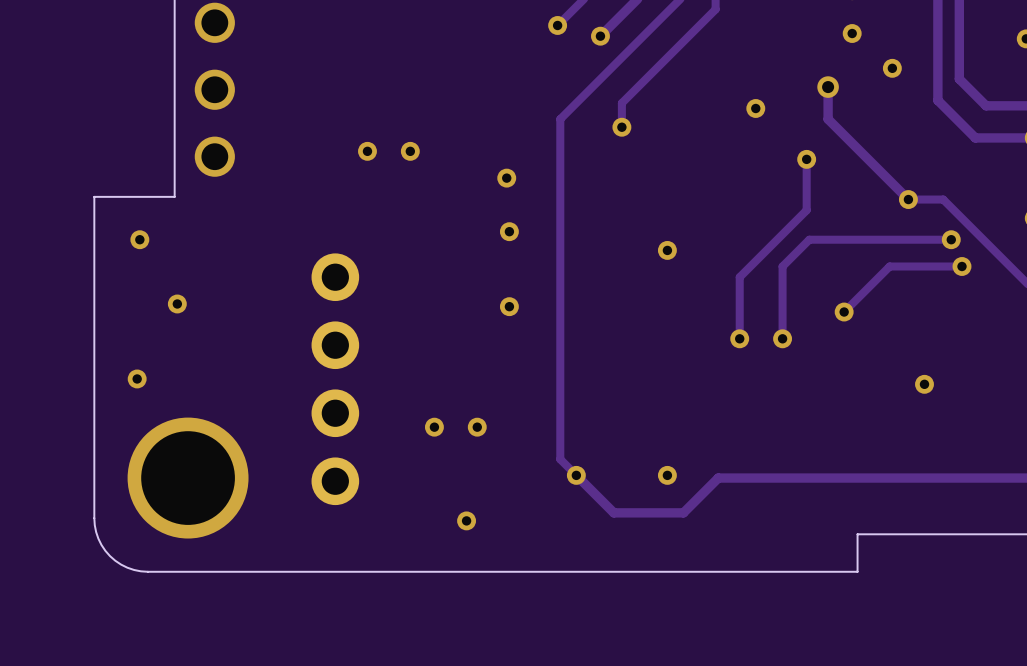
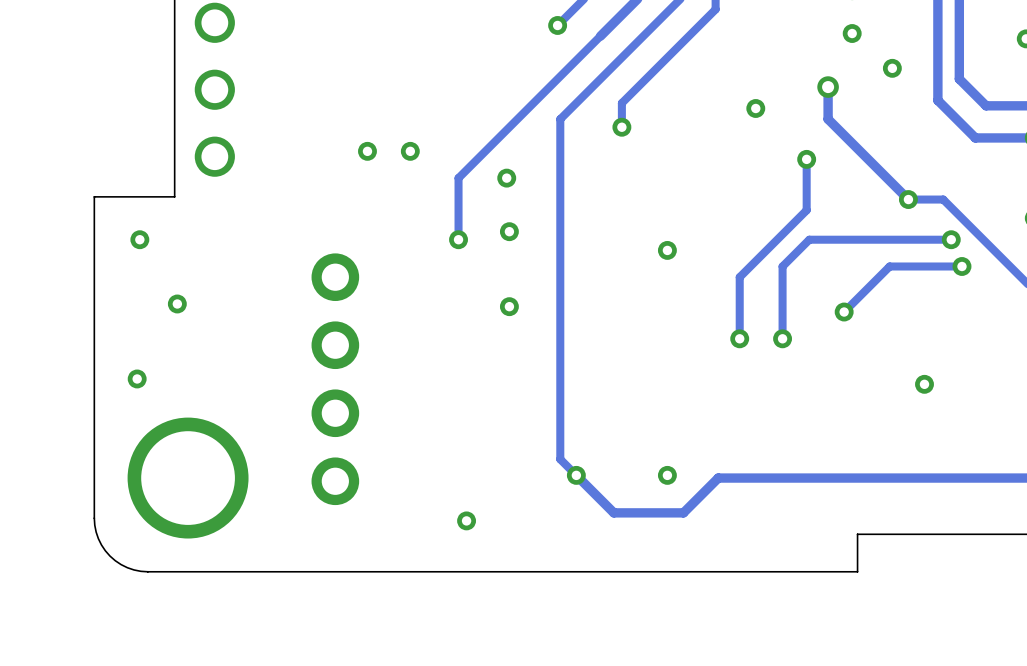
track: none -> (600, 36) (458, 178) (458, 239)
via: (600, 36) -> none
via: none -> (458, 239)
via: (434, 427) -> none
via: (477, 427) -> none

